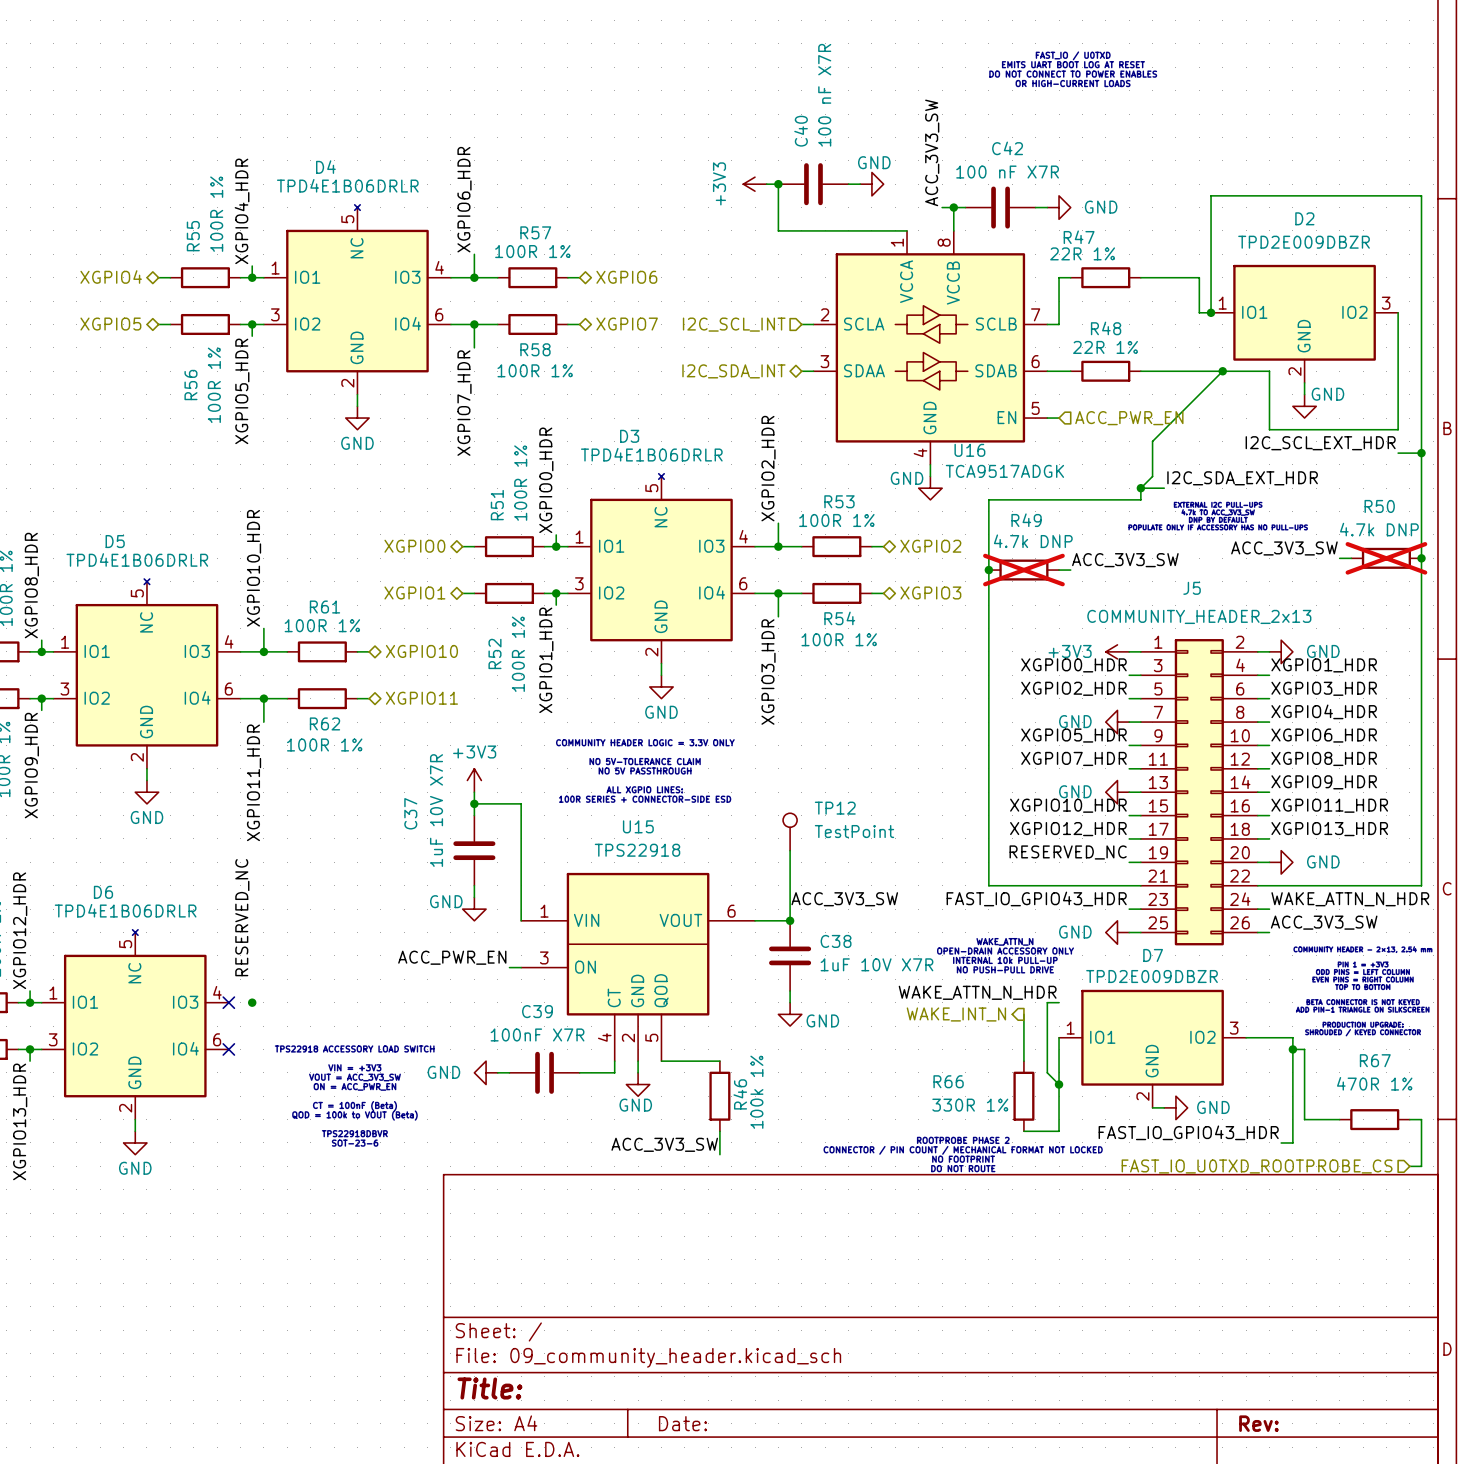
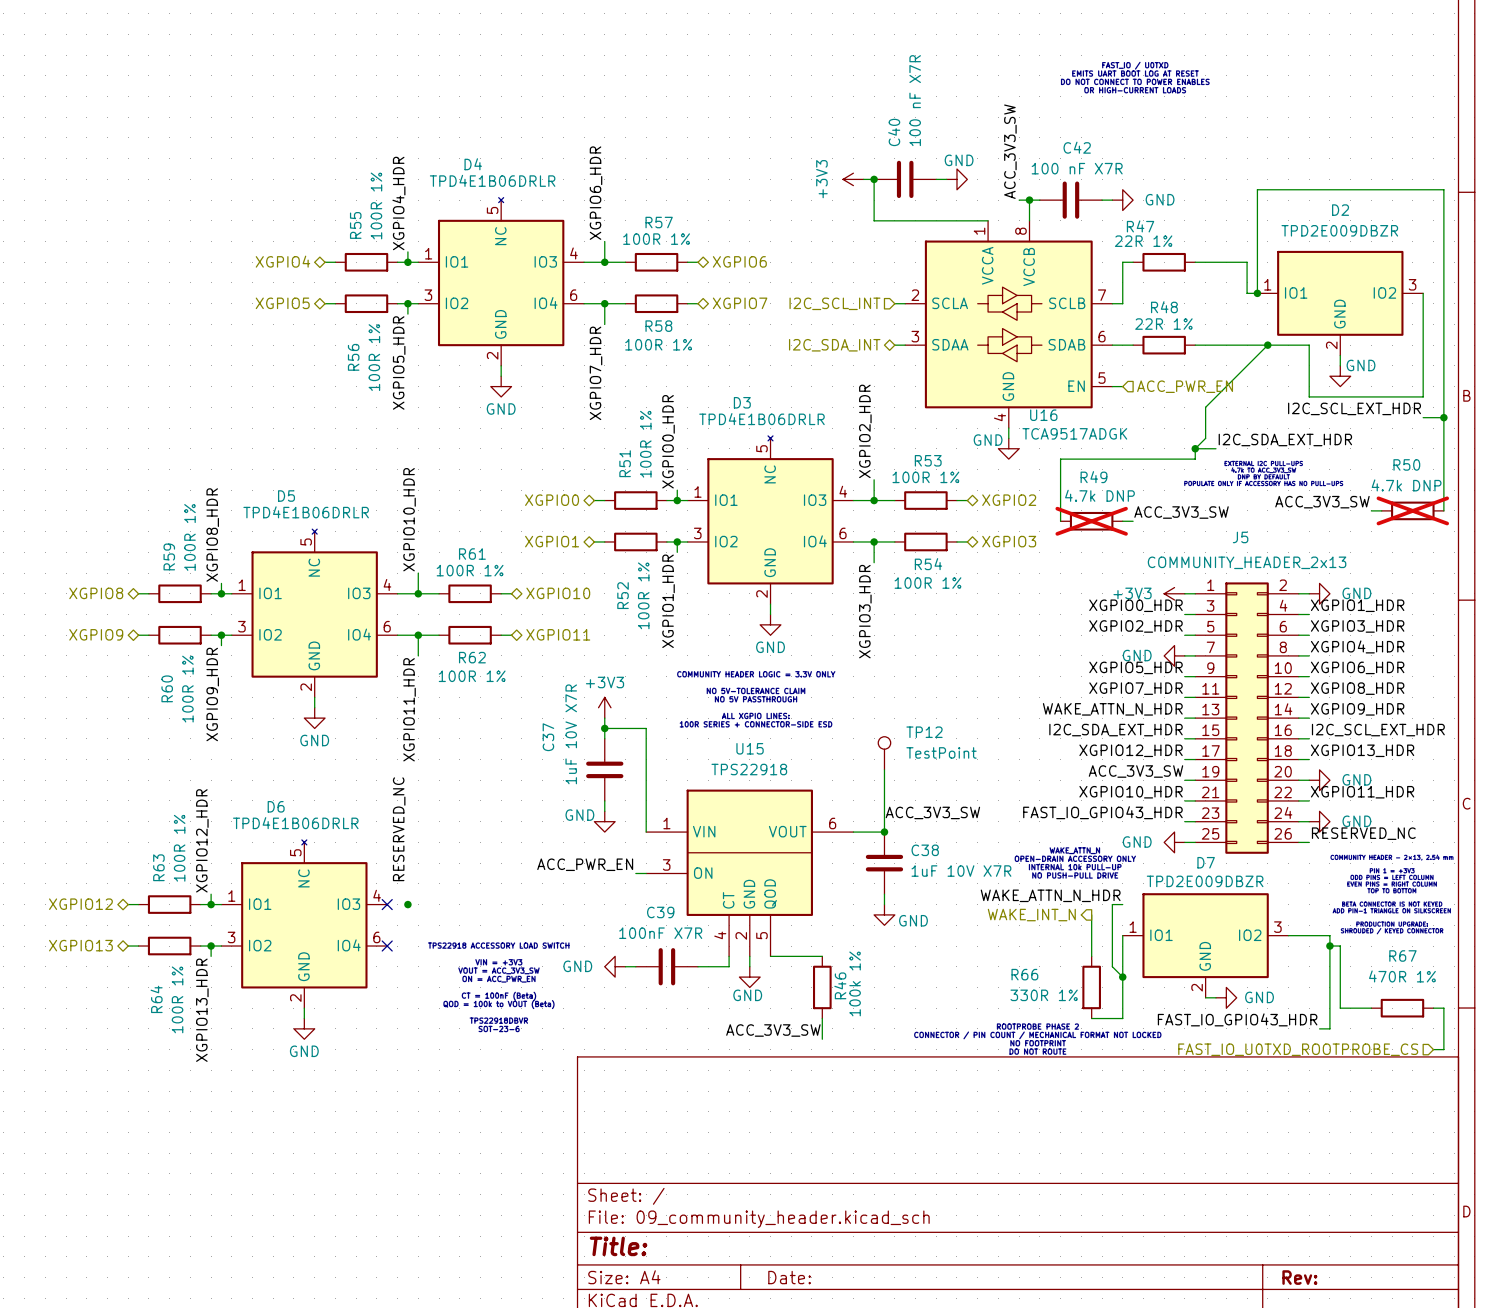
wire: (1421, 558) (1421, 885) (1269, 885) -> none
junction: (1421, 558) -> none
wire: (988, 570) (988, 885) (1129, 885) -> none
junction: (988, 570) -> none
power symbol rotation: 0° (1117, 792) -> 180° (1319, 821)
power symbol position: GND (1117, 792) -> GND (1319, 821)
label: XGPIO10_HDR (1068, 805) -> I2C_SDA_EXT_HDR (1116, 730)
label: XGPIO11_HDR (1329, 805) -> I2C_SCL_EXT_HDR (1378, 730)
label: RESERVED_NC (1068, 852) -> ACC_3V3_SW (1135, 771)
label: none -> XGPIO10_HDR (1131, 792)
label: none -> XGPIO11_HDR (1362, 792)
label position: WAKE_ATTN_N_HDR (1350, 899) -> WAKE_ATTN_N_HDR (1112, 709)
label: ACC_3V3_SW (1324, 922) -> RESERVED_NC (1363, 833)

